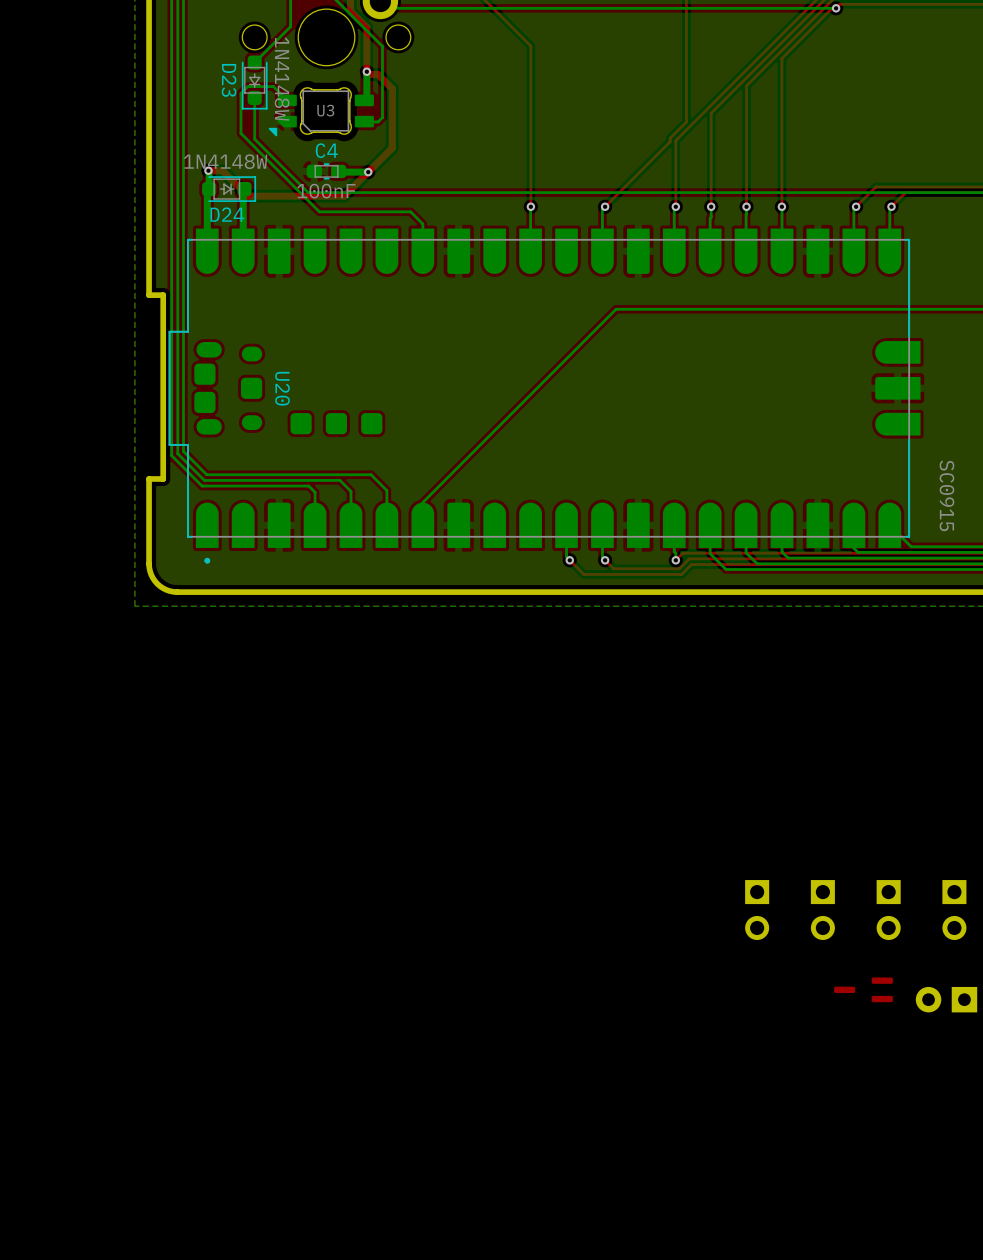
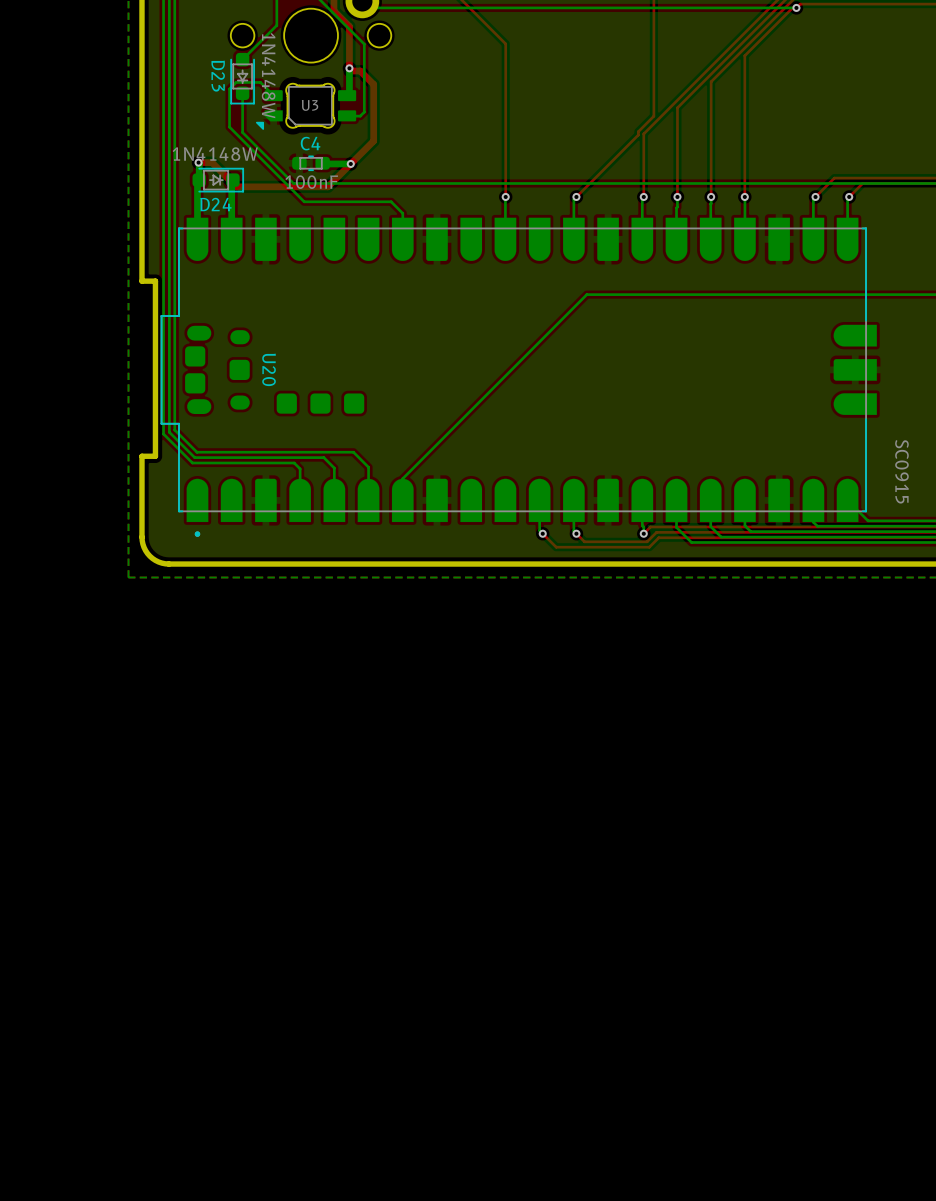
part: (757, 910) -> none
part: (822, 910) -> none
part: (888, 910) -> none
part: (954, 910) -> none
part: (863, 989) -> none
part: (946, 999) -> none

